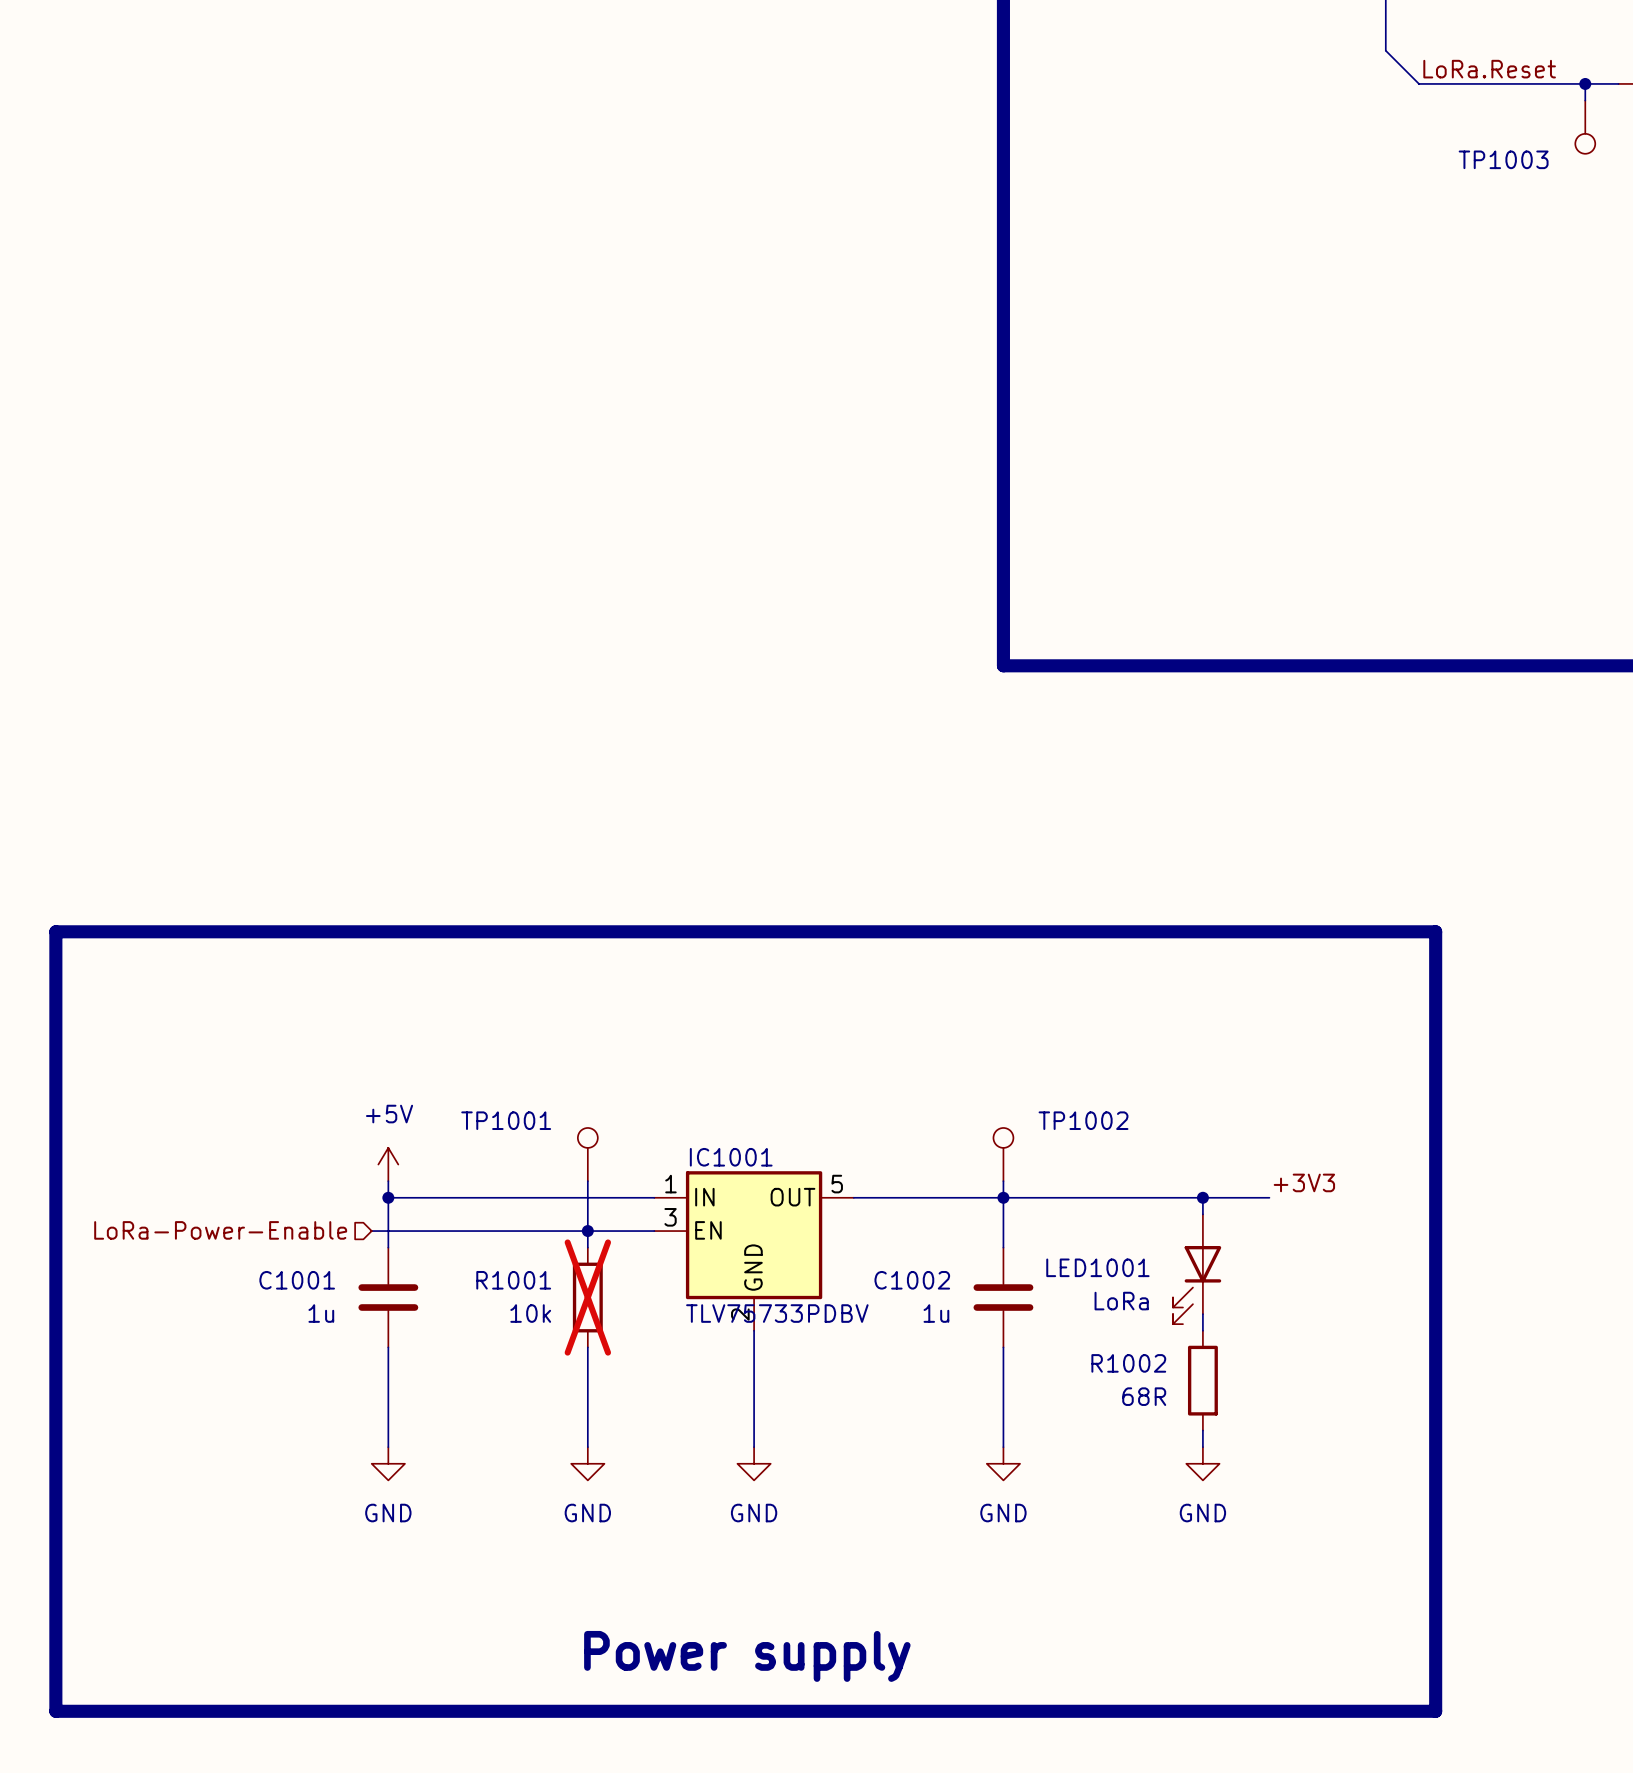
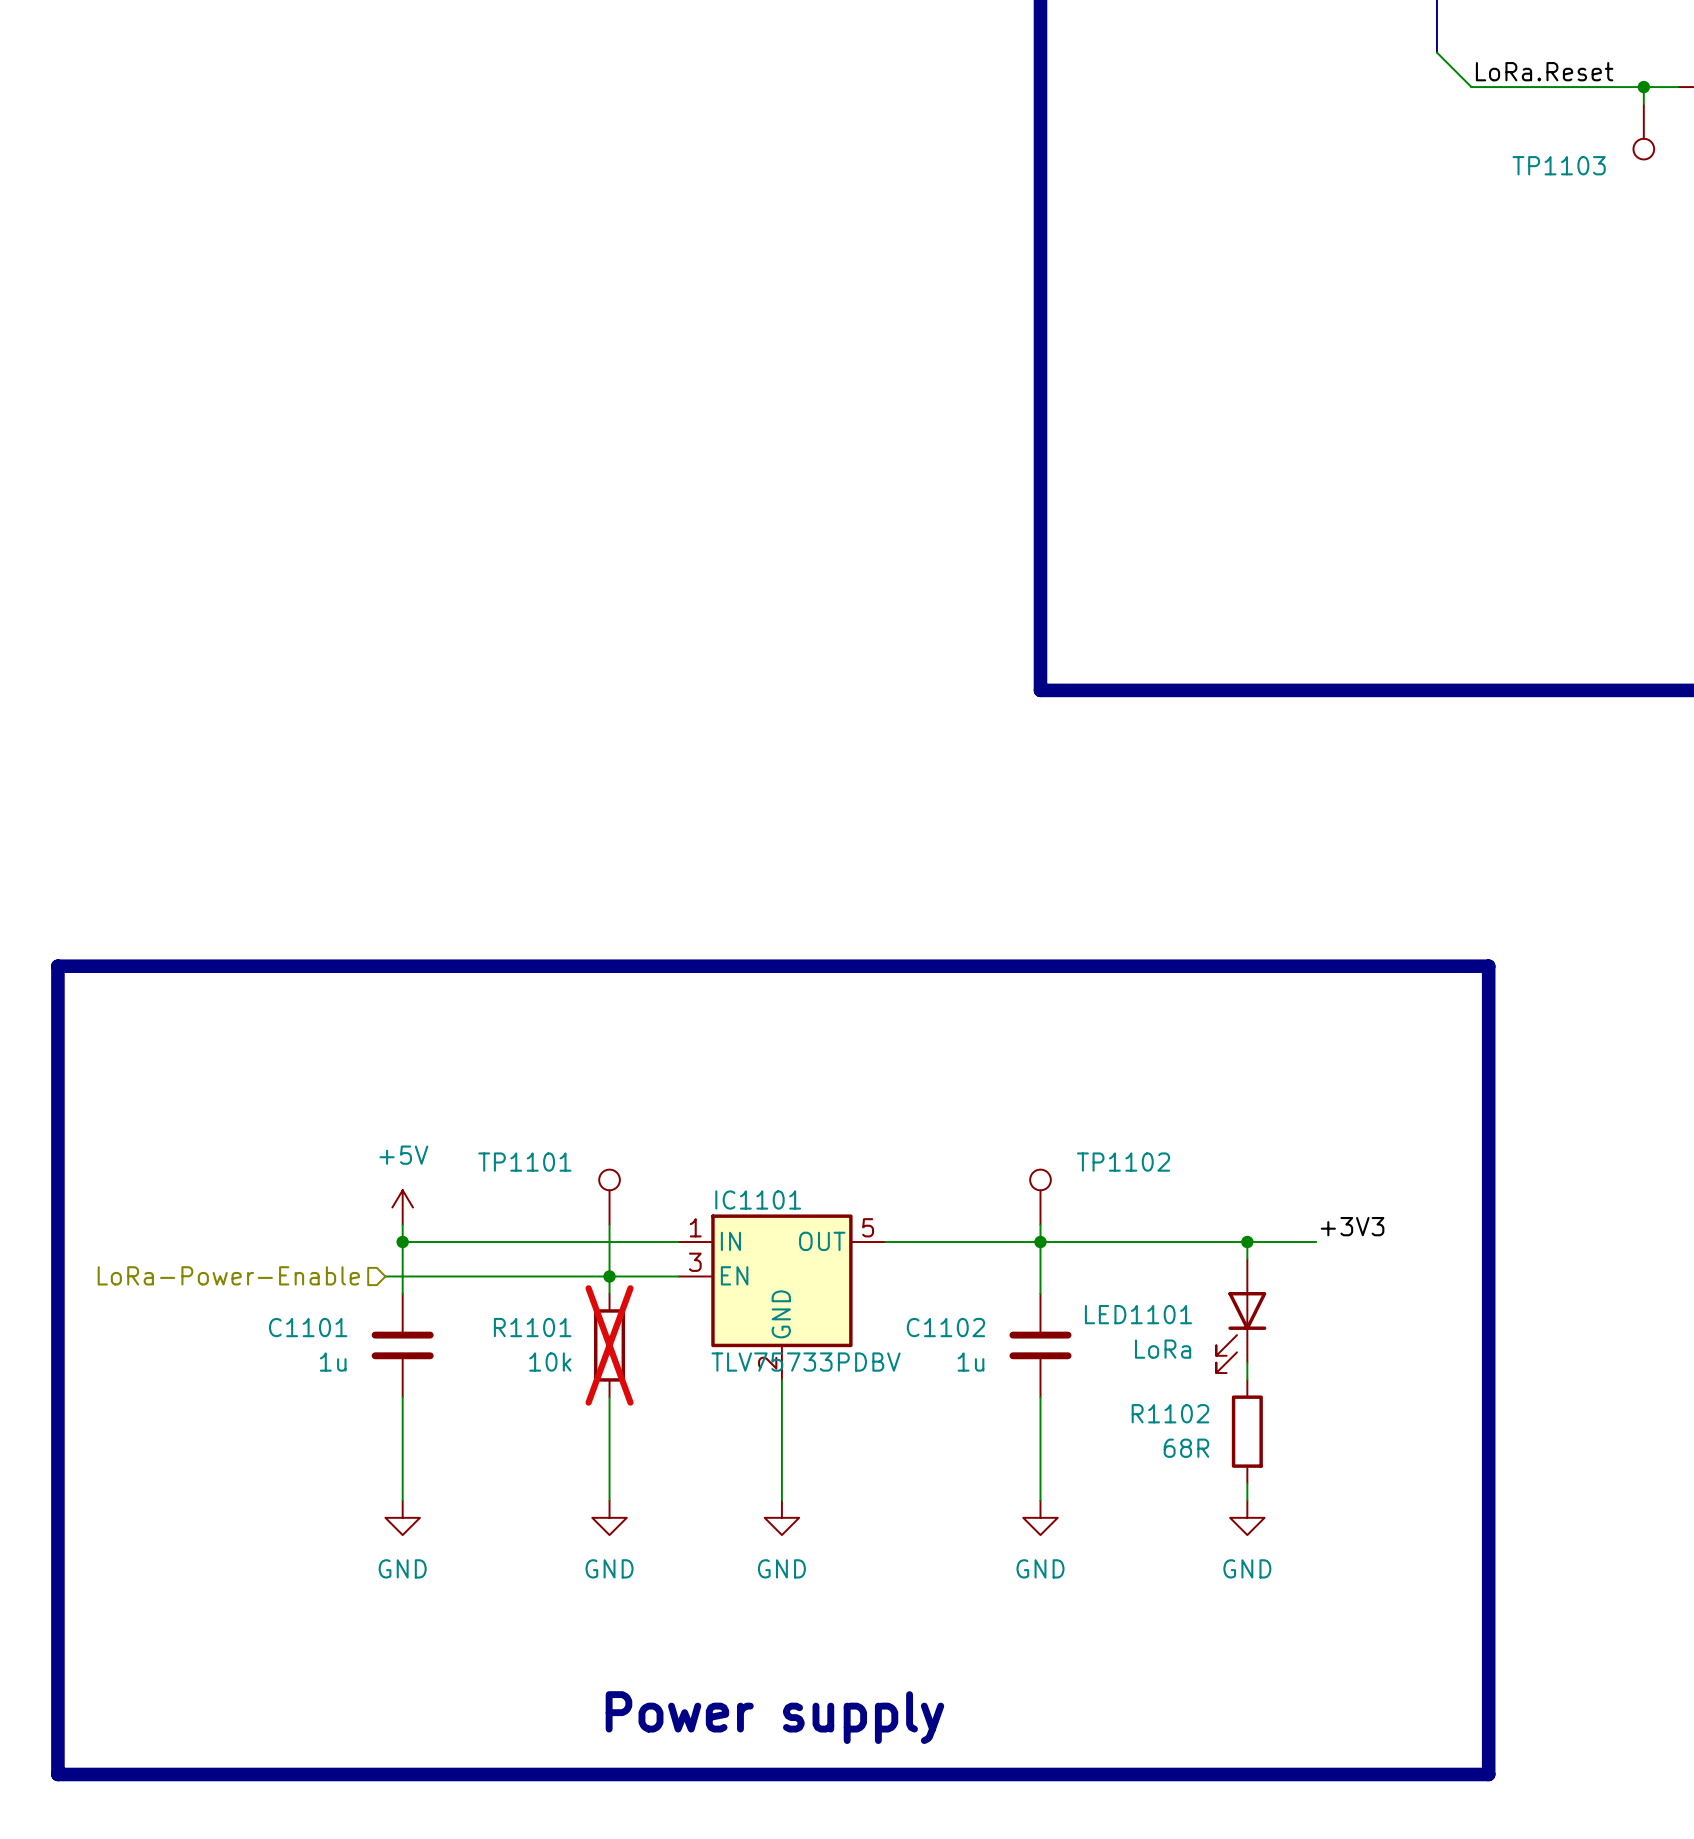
TP1003 name: TP1003 (1503, 159) -> TP1103 (1559, 165)
TP1001 name: TP1001 (506, 1120) -> TP1101 (524, 1162)
TP1002 name: TP1002 (1083, 1120) -> TP1102 (1123, 1162)
IC1001 name: IC1001 (731, 1157) -> IC1101 (758, 1200)
LED1001 name: LED1001 (1097, 1267) -> LED1101 (1138, 1314)
C1001 name: C1001 (297, 1280) -> C1101 (308, 1327)
R1001 name: R1001 (513, 1280) -> R1101 (532, 1327)
C1002 name: C1002 (912, 1280) -> C1102 (945, 1327)
R1002 name: R1002 (1128, 1363) -> R1102 (1170, 1413)

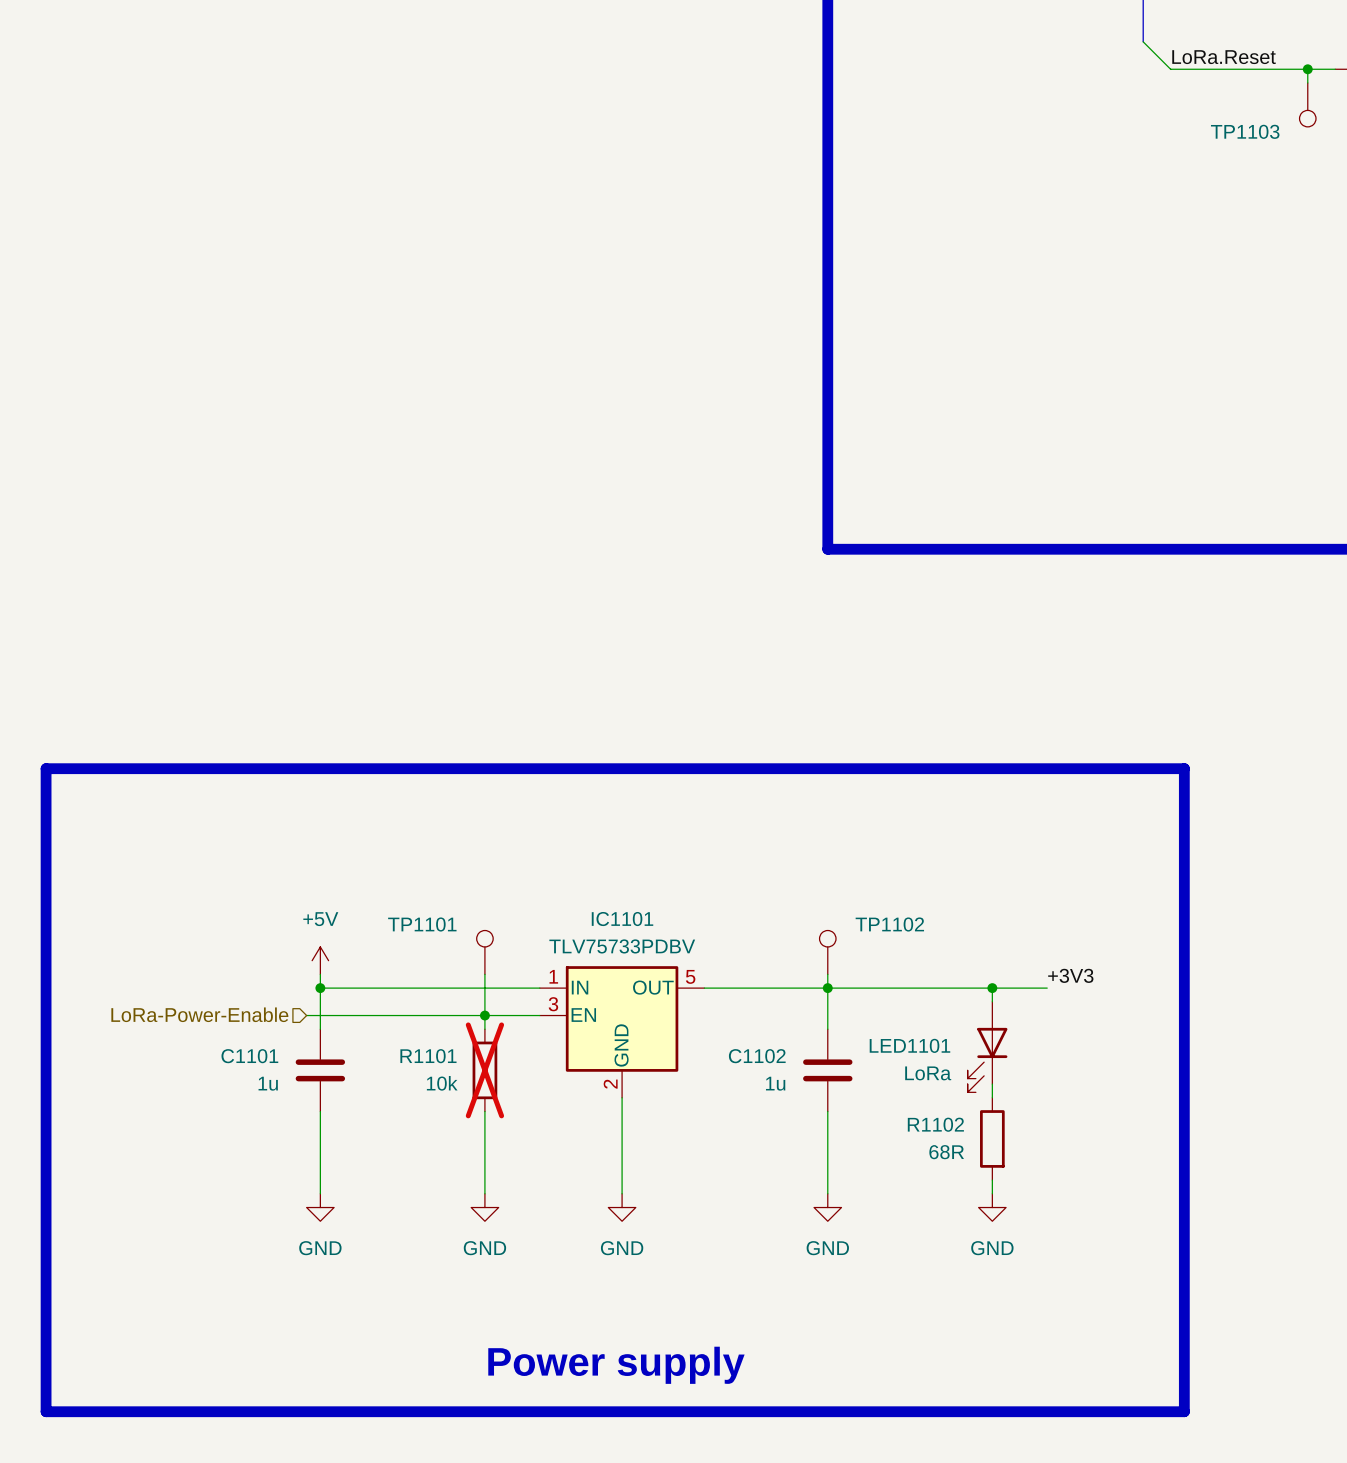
IC1101 name position: IC1101 (758, 1200) -> IC1101 (622, 919)
IC1101 value position: TLV75733PDBV (806, 1362) -> TLV75733PDBV (622, 946)

